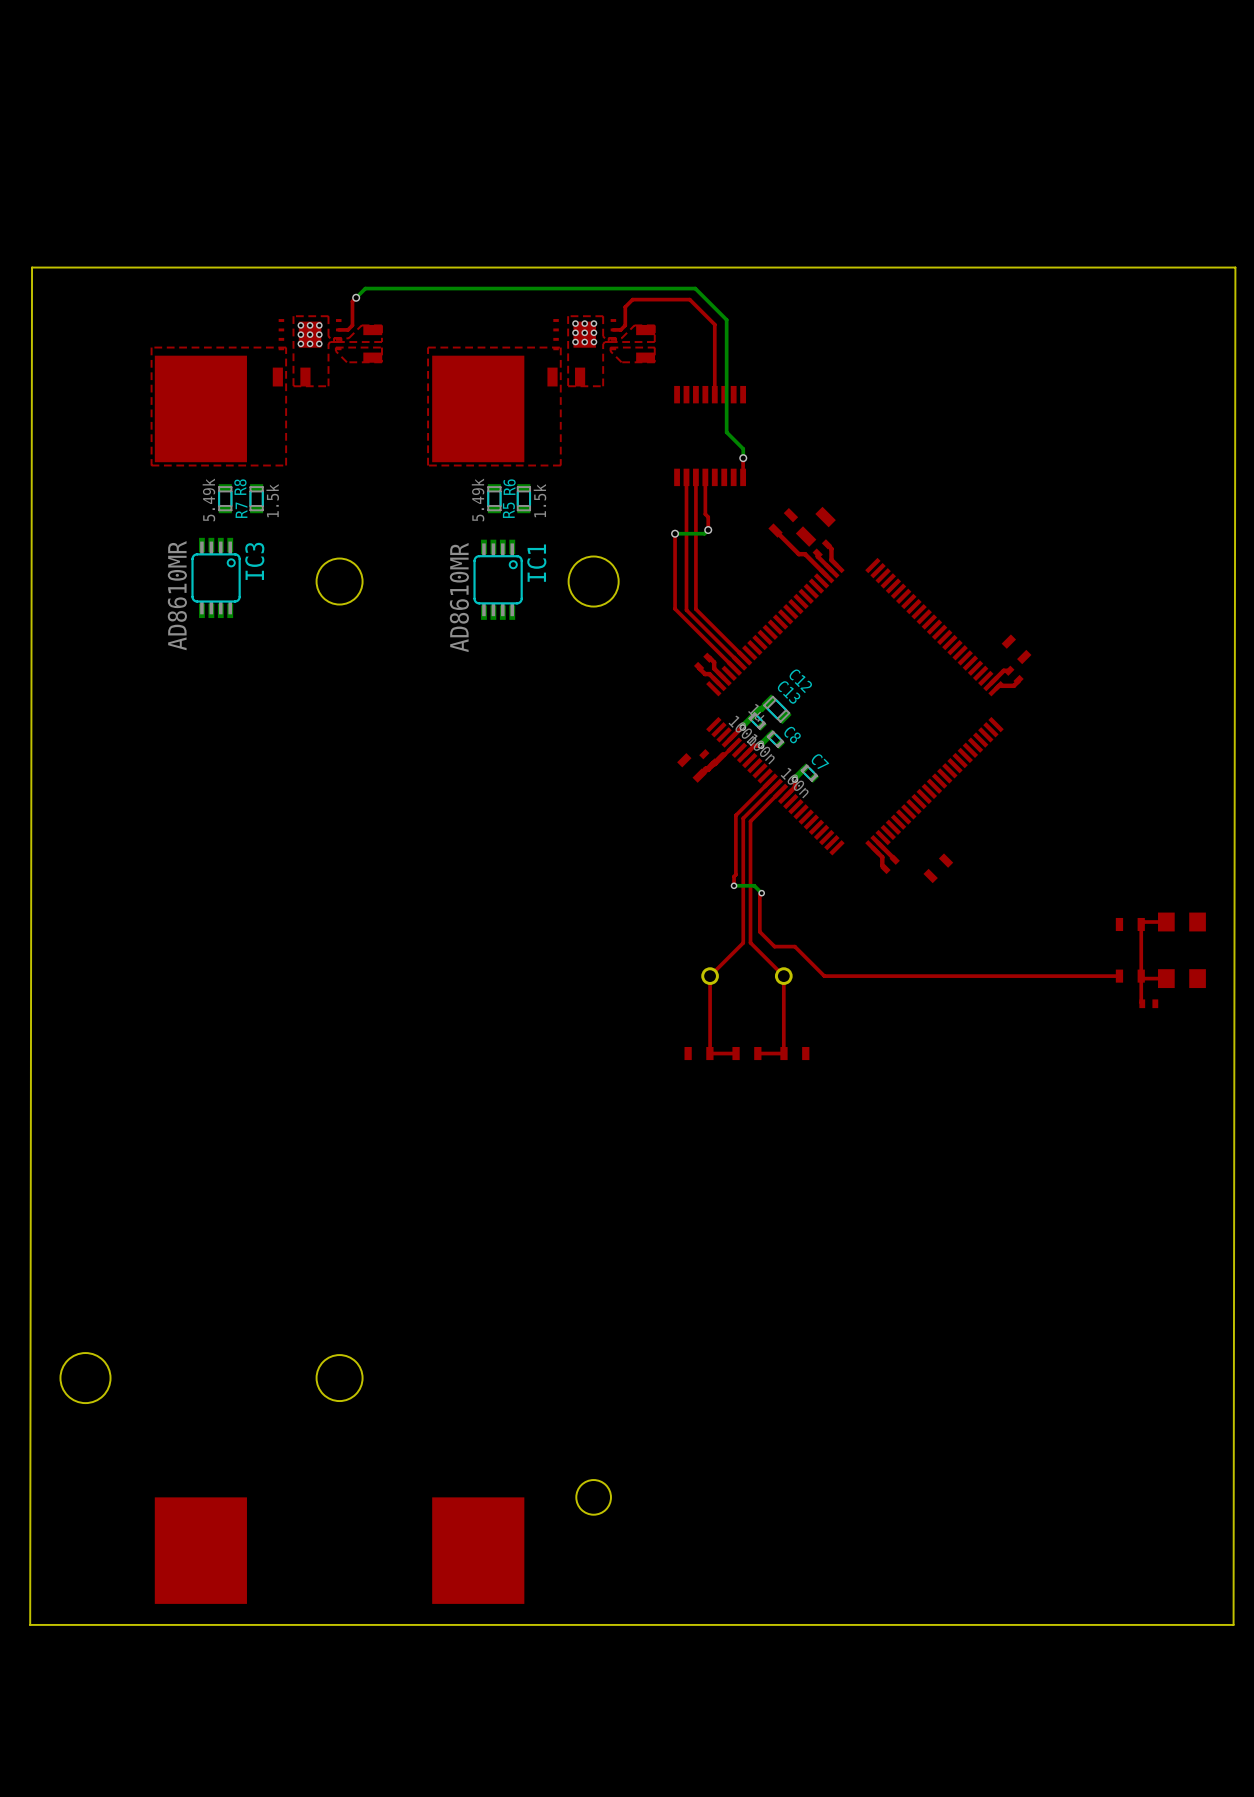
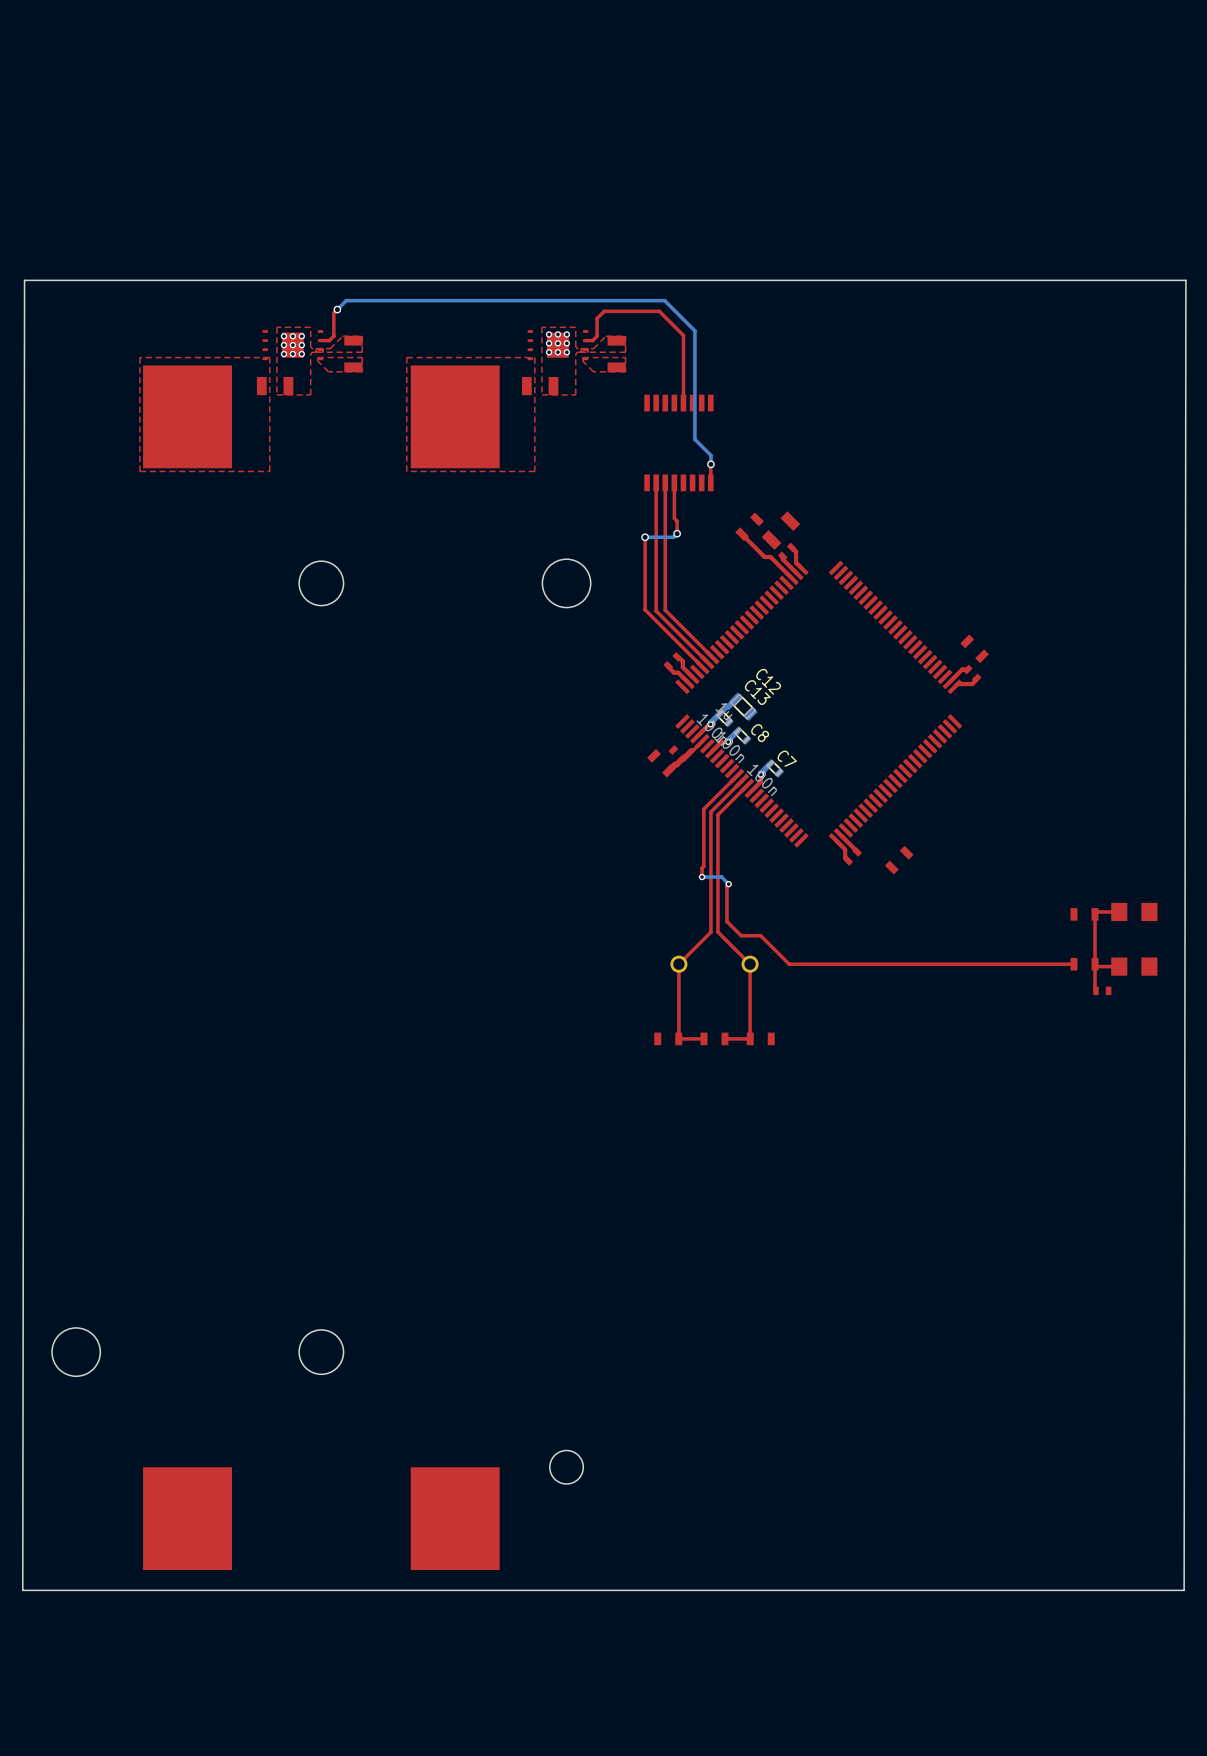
R8: 5.49k (225, 498) -> none
R7: 1.5k (256, 498) -> none
R6: 5.49k (494, 498) -> none
R5: 1.5k (523, 498) -> none
IC3: AD8610MR (216, 577) -> none
IC1: AD8610MR (498, 579) -> none

